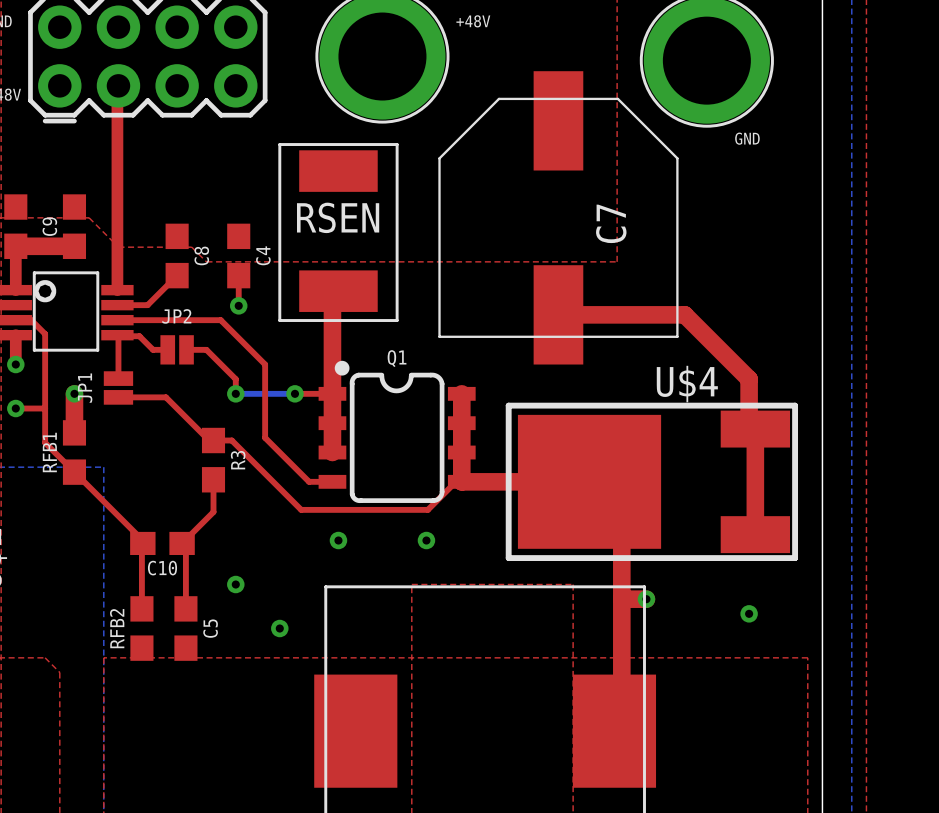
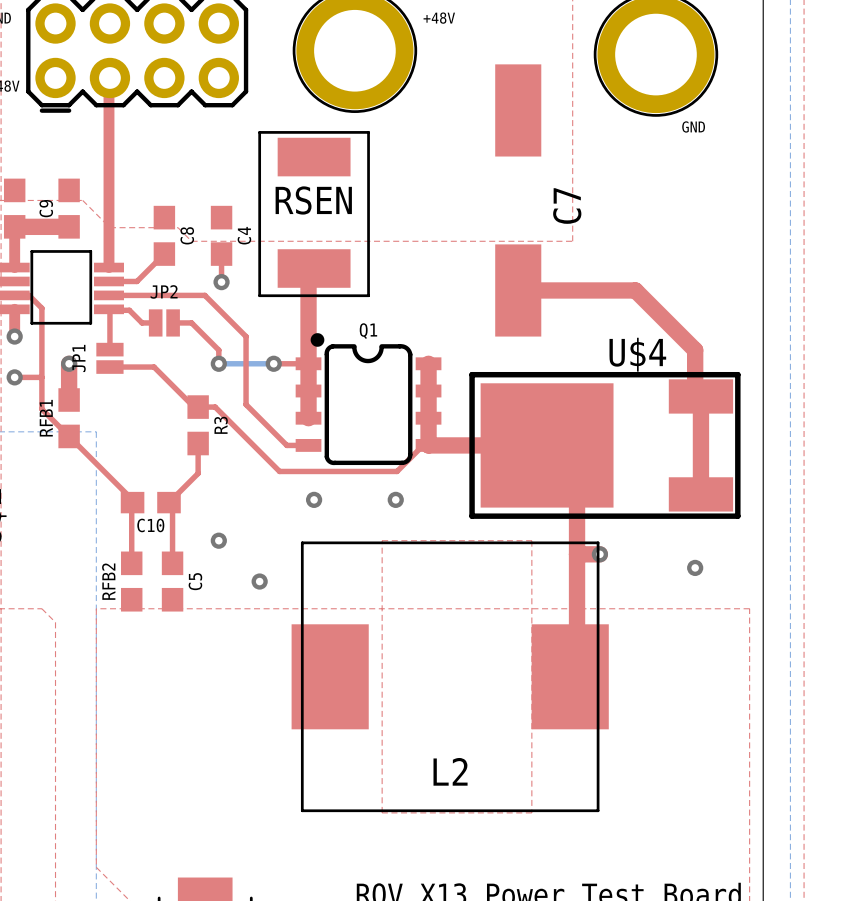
C7 footprint: [438, 71, 679, 365] -> [495, 64, 542, 337]
drawing: [33, 280, 57, 303] -> none

